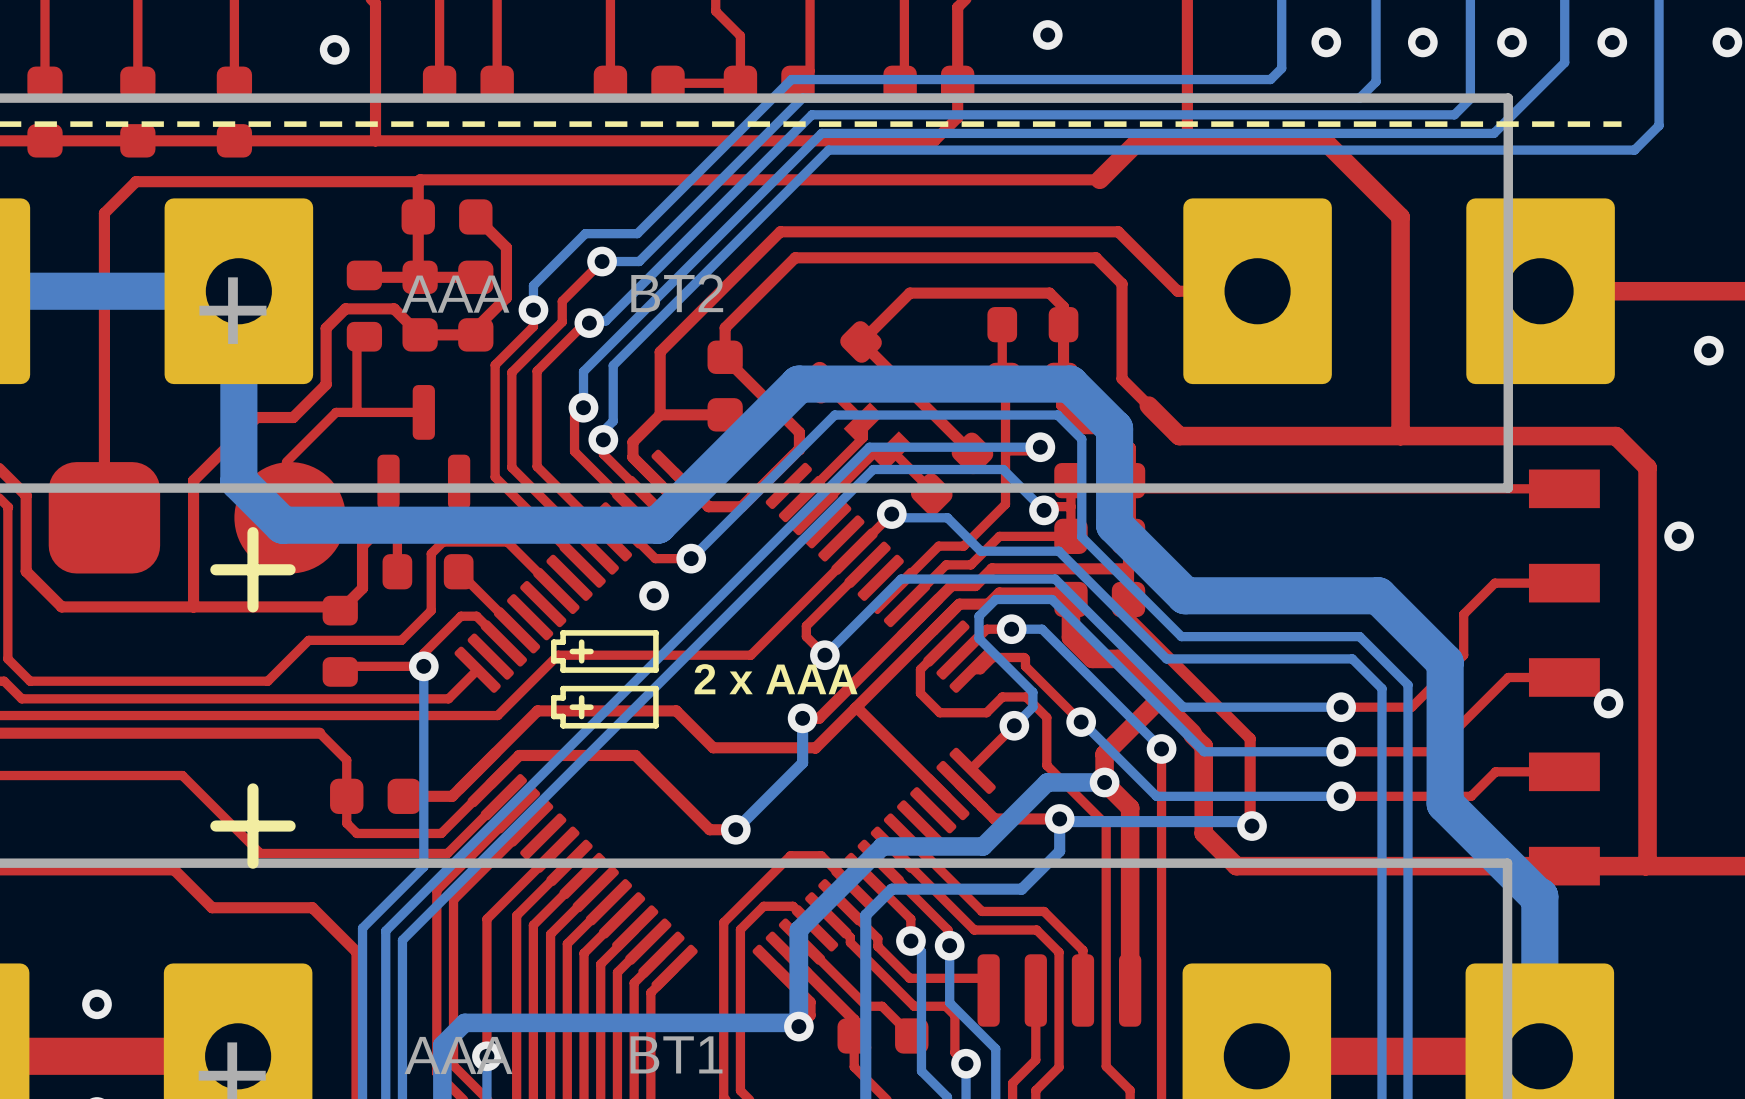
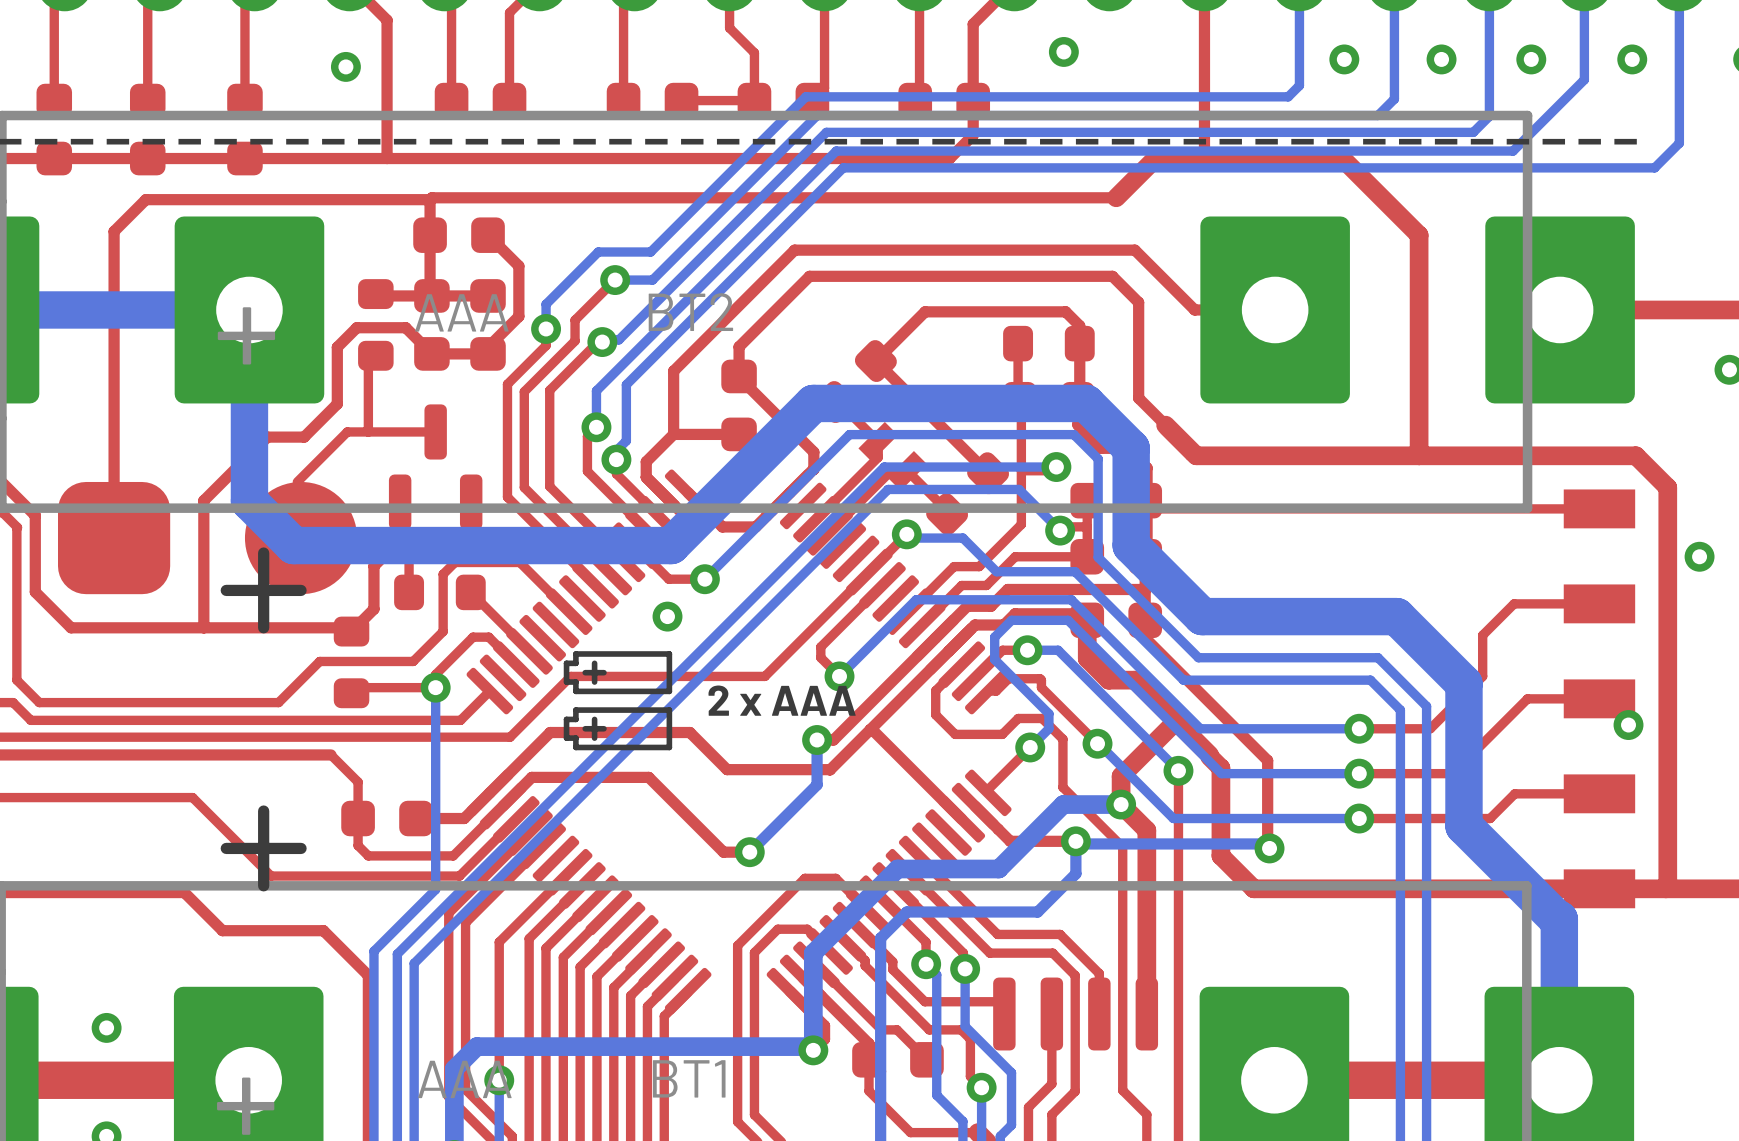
part position: (1564, 677) -> (1599, 698)

